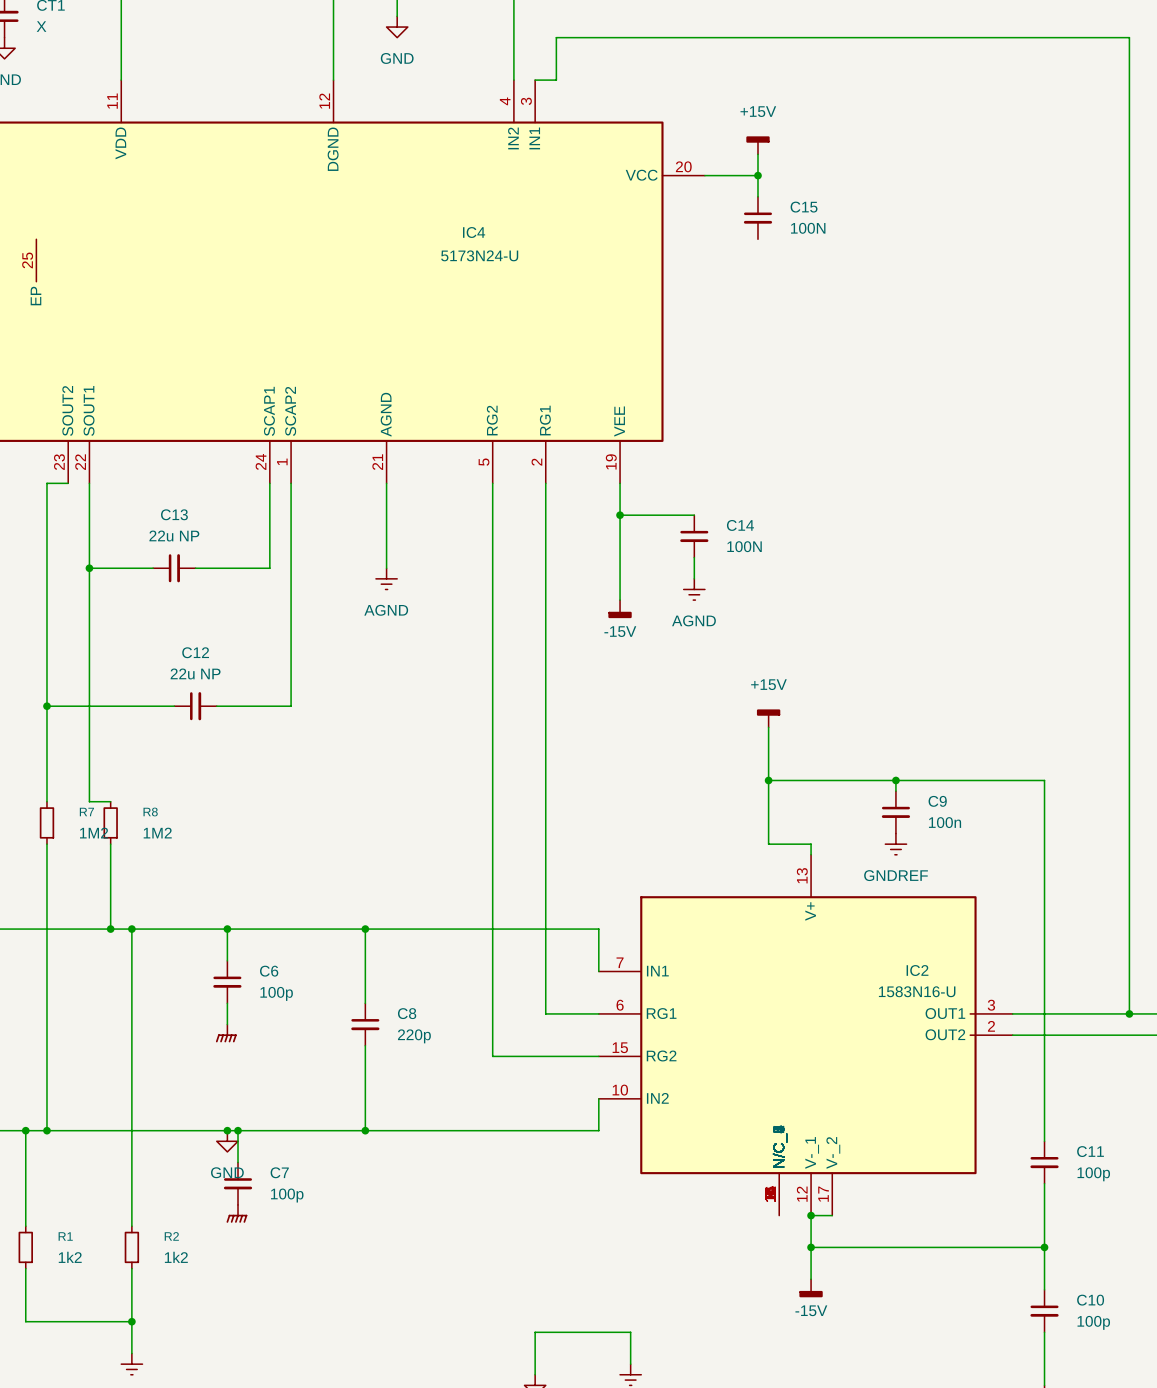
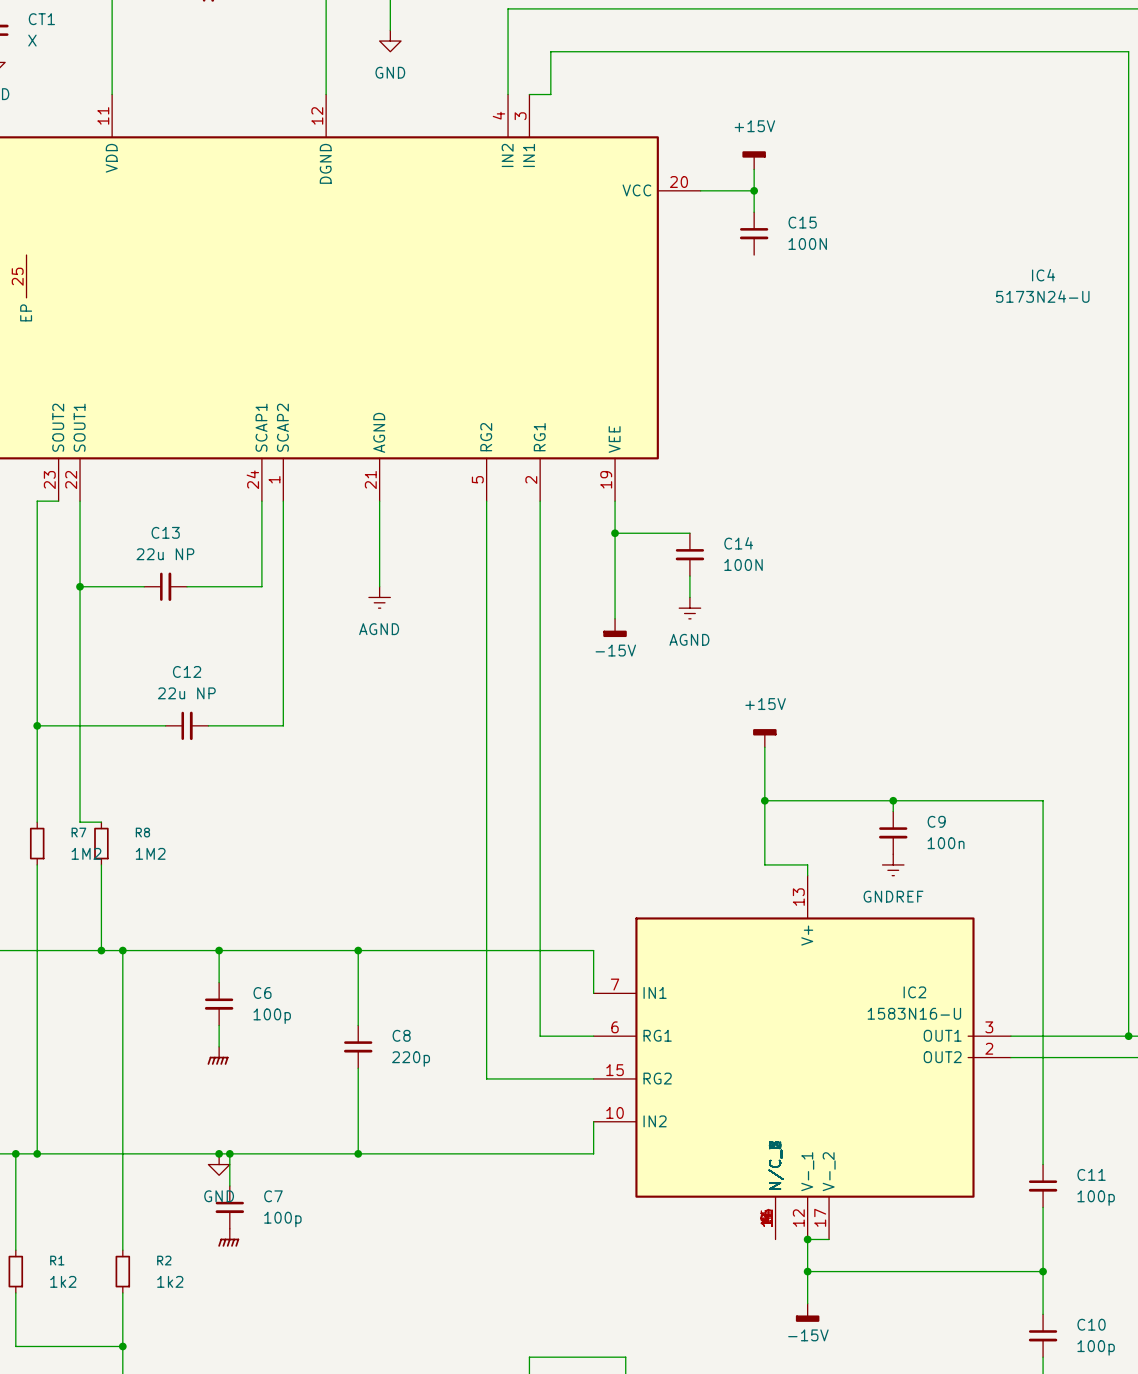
IC4 name position: IC4 (474, 232) -> IC4 (1043, 275)
IC4 value position: 5173N24-U (479, 255) -> 5173N24-U (1042, 296)

